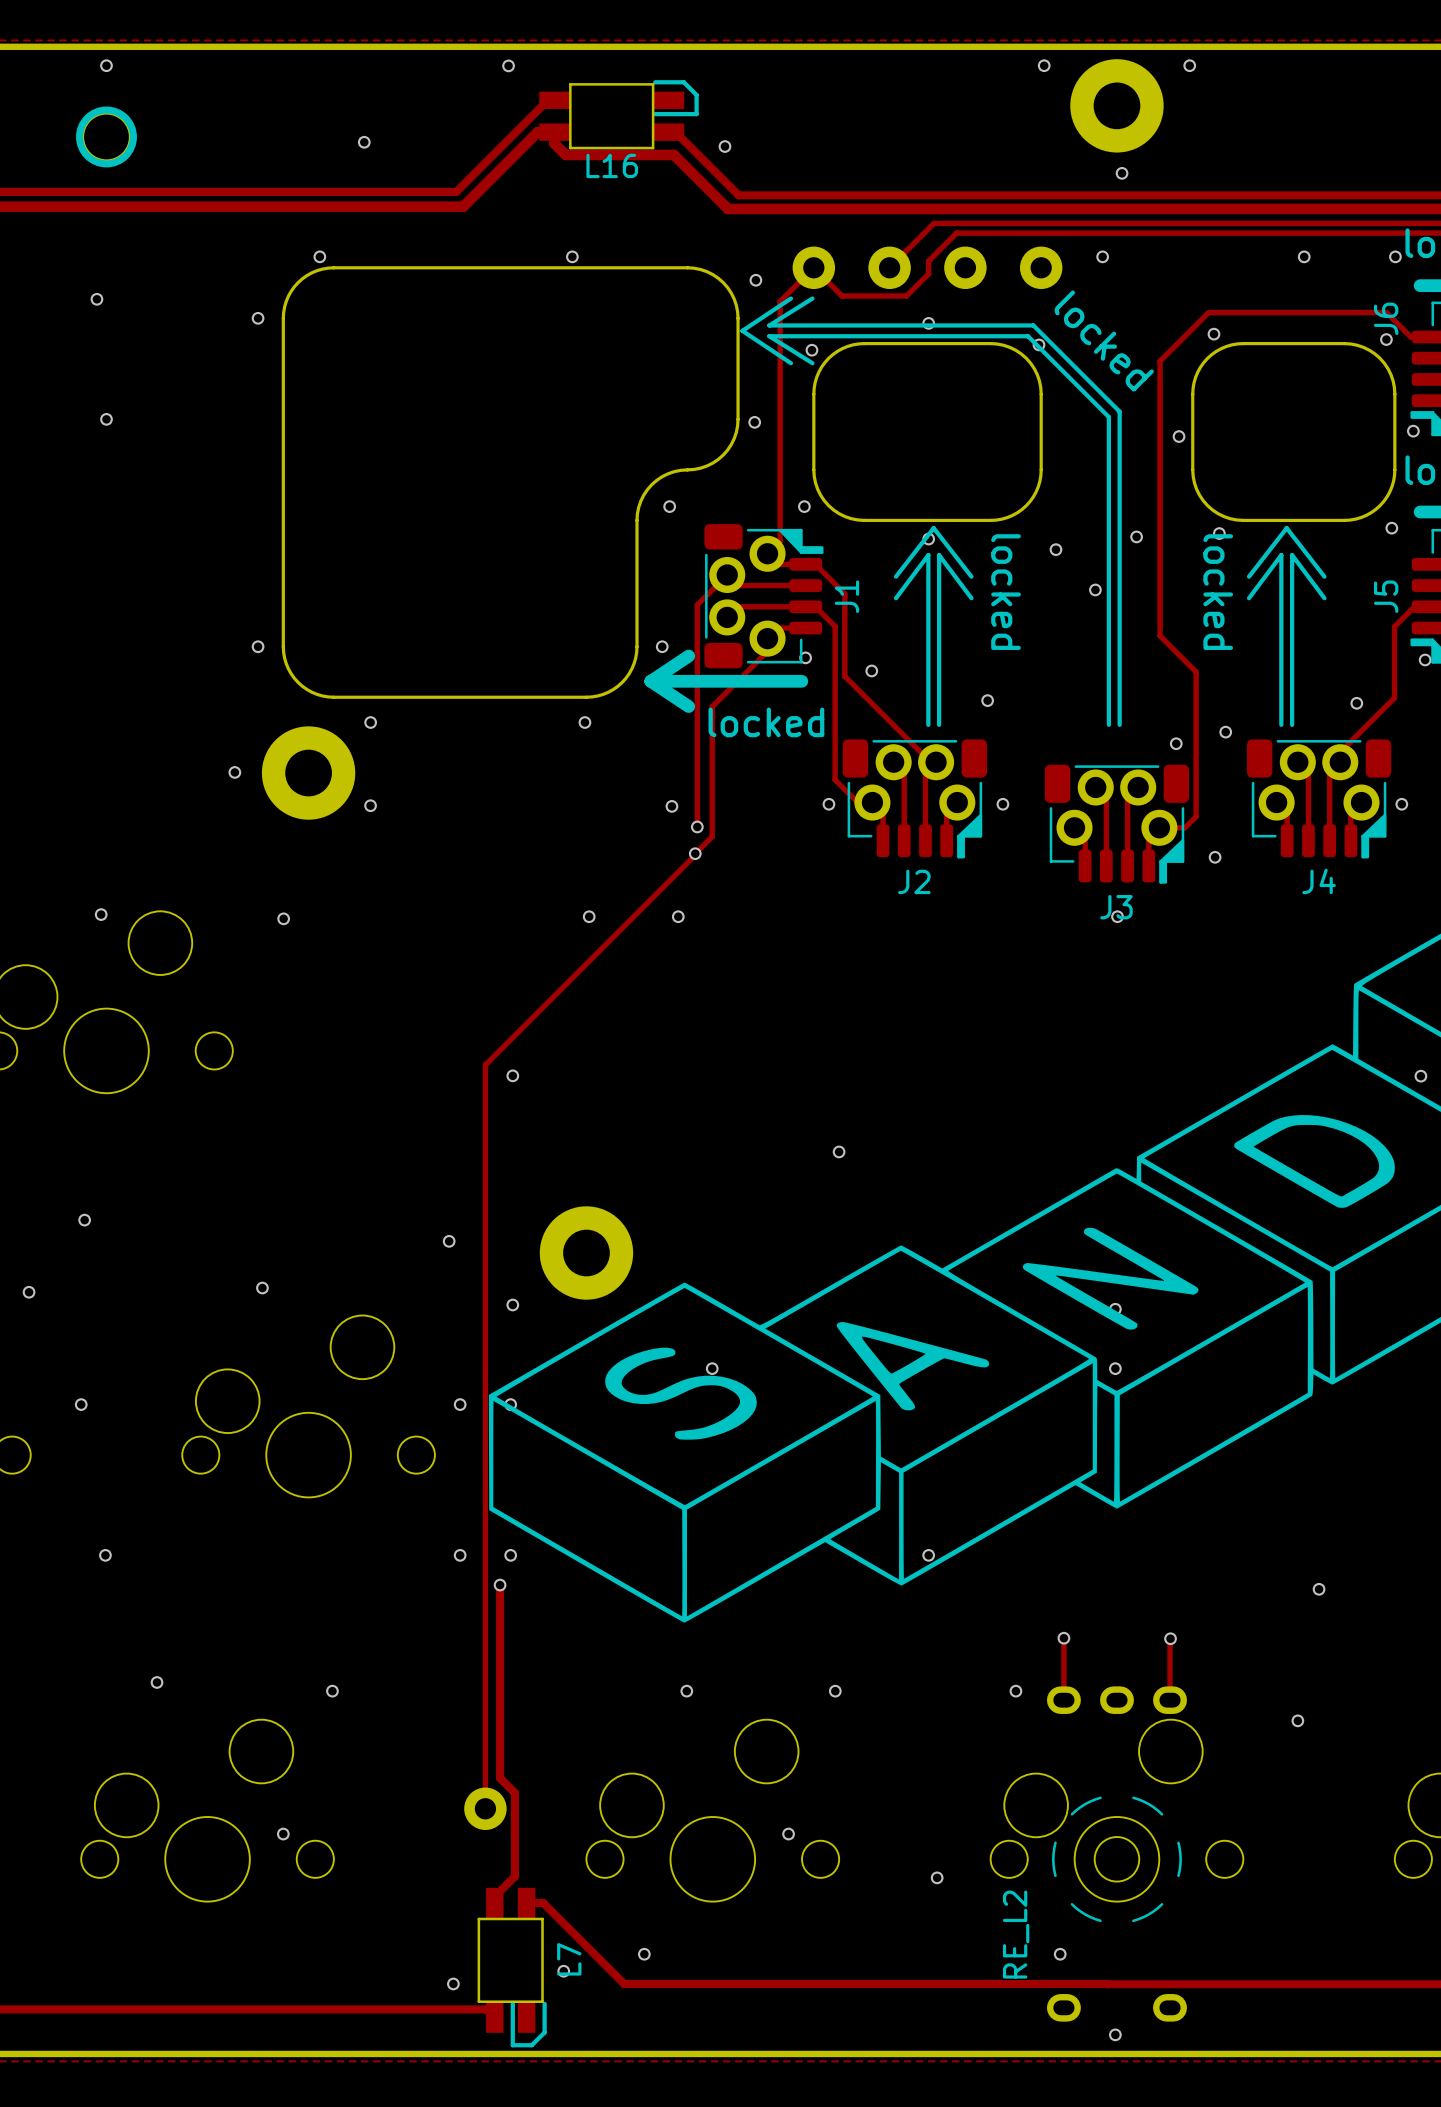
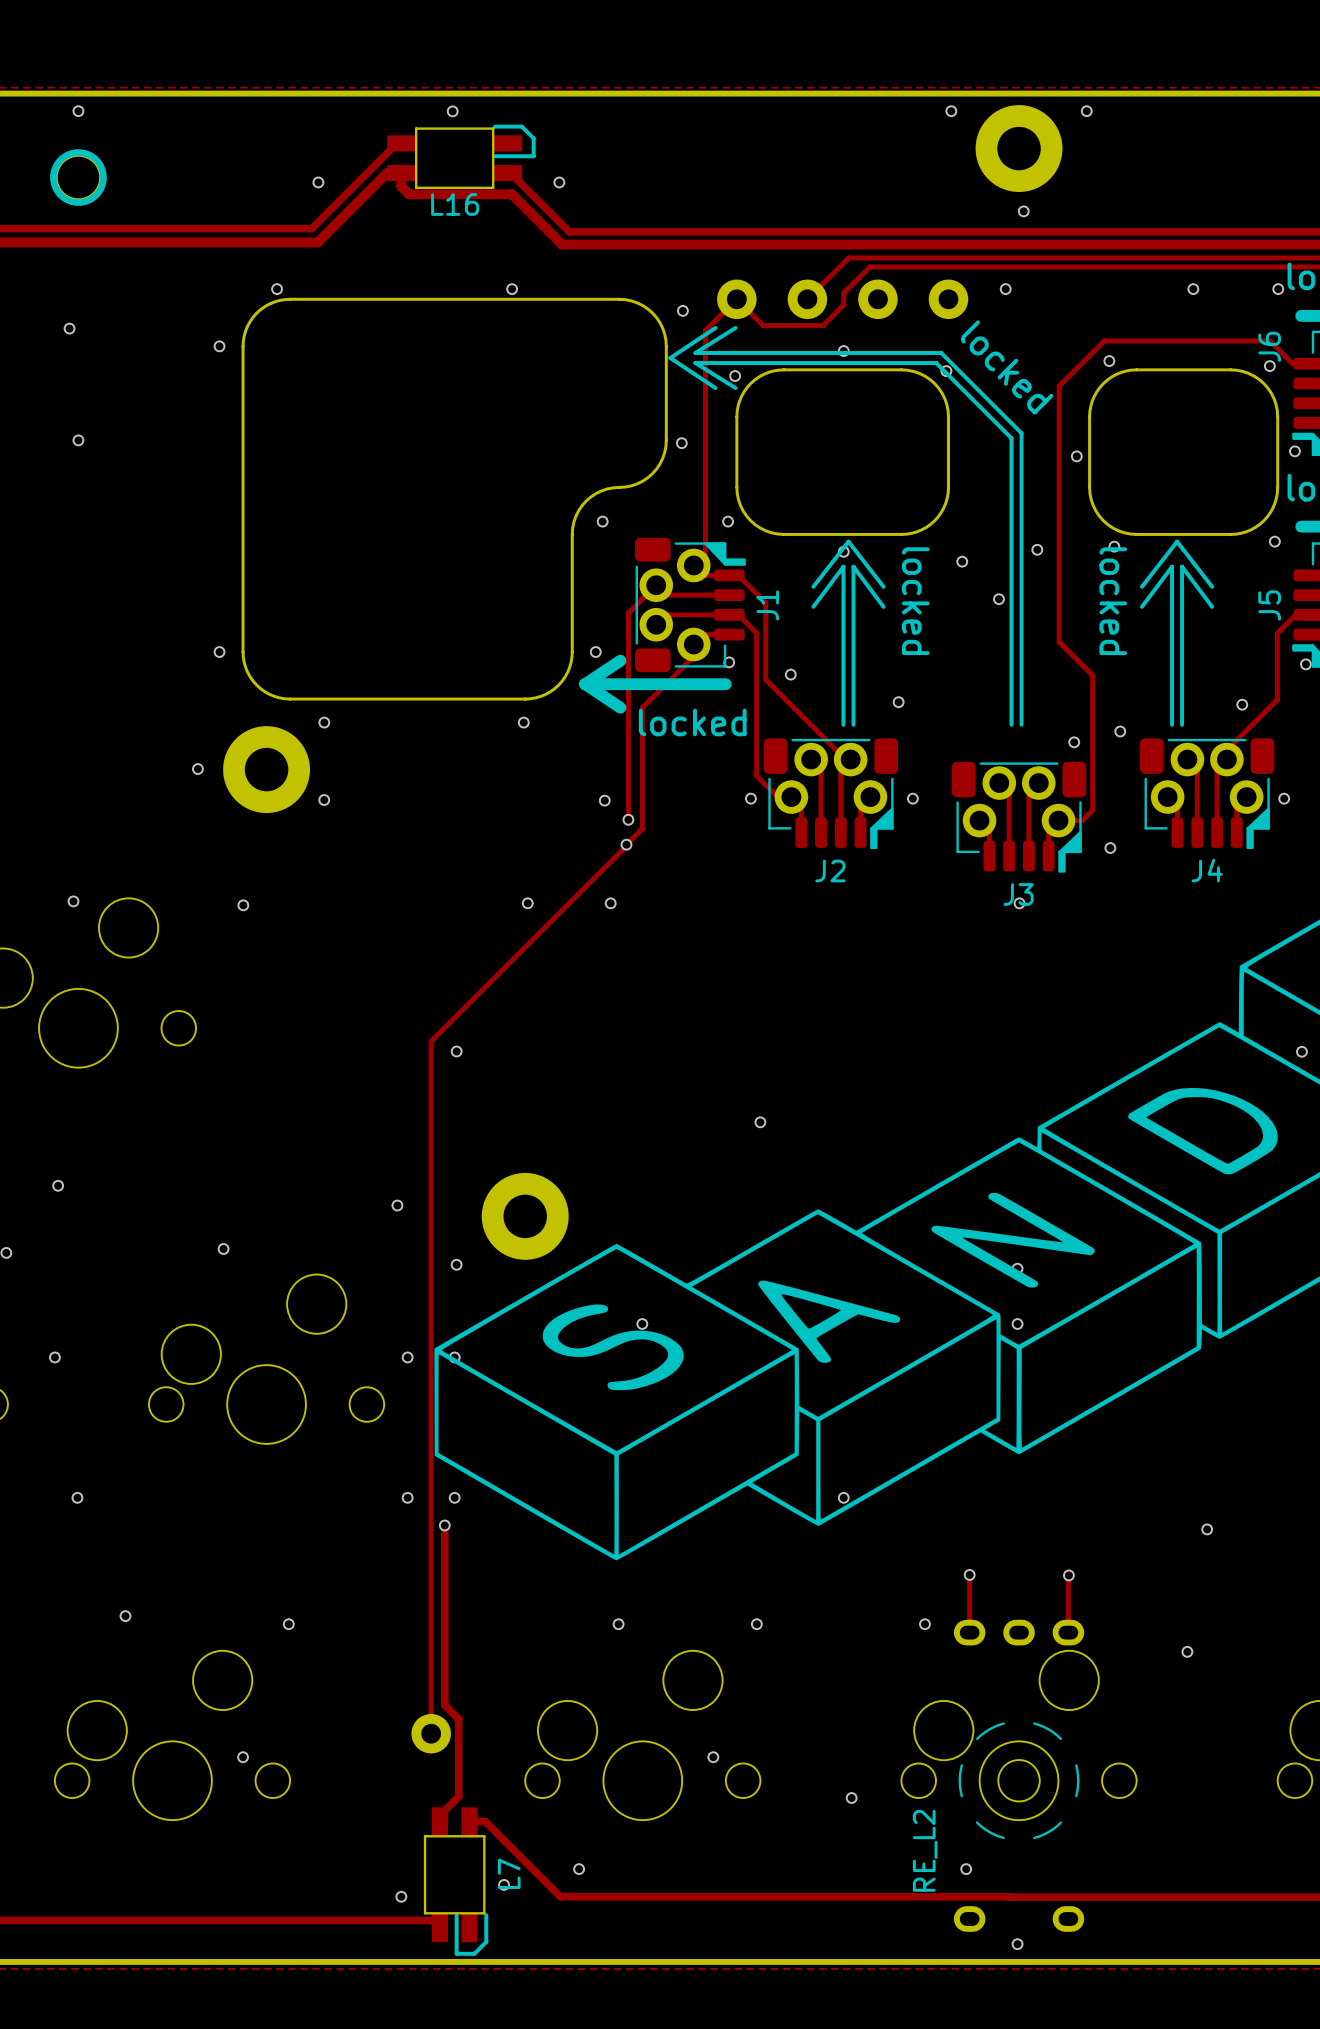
track: (554, 100) (547, 100) (456, 191) (357, 191) -> (401, 143) (396, 143) (311, 228)
L16 position: (618, 114) -> (461, 156)
track: (669, 132) (675, 132) (738, 195) -> (508, 173) (510, 173) (569, 231) (666, 231)
via position: (724, 146) -> (559, 182)
track: (565, 154) (554, 143) (554, 132) (537, 132) (463, 206) (363, 206) -> (505, 194) (409, 194) (401, 186) (401, 173) (387, 173) (317, 242)
track: (572, 154) (673, 154) (728, 208) -> (511, 194) (562, 244) (656, 244)

